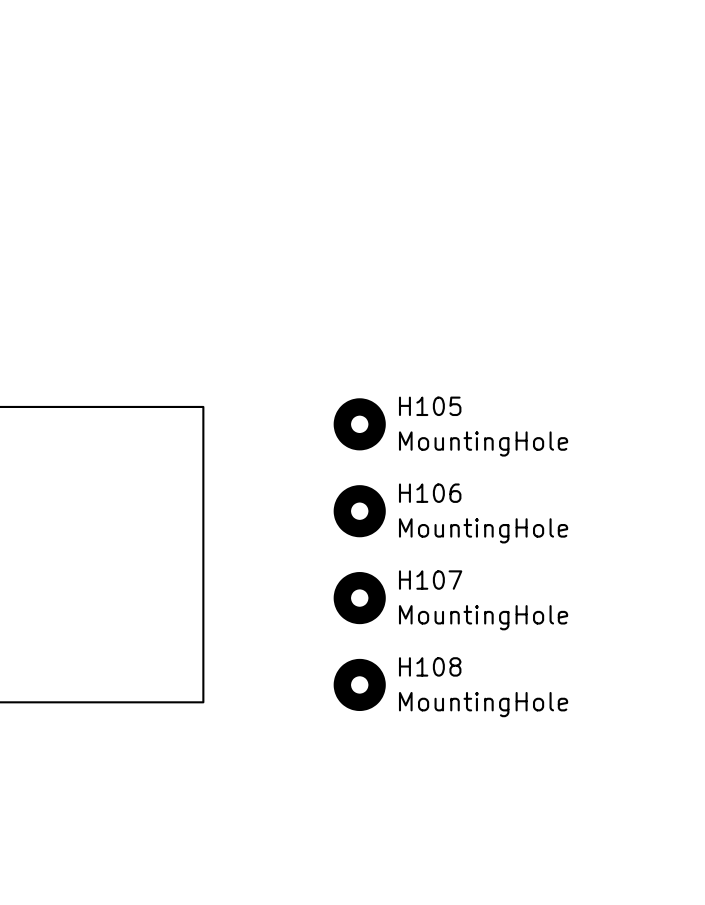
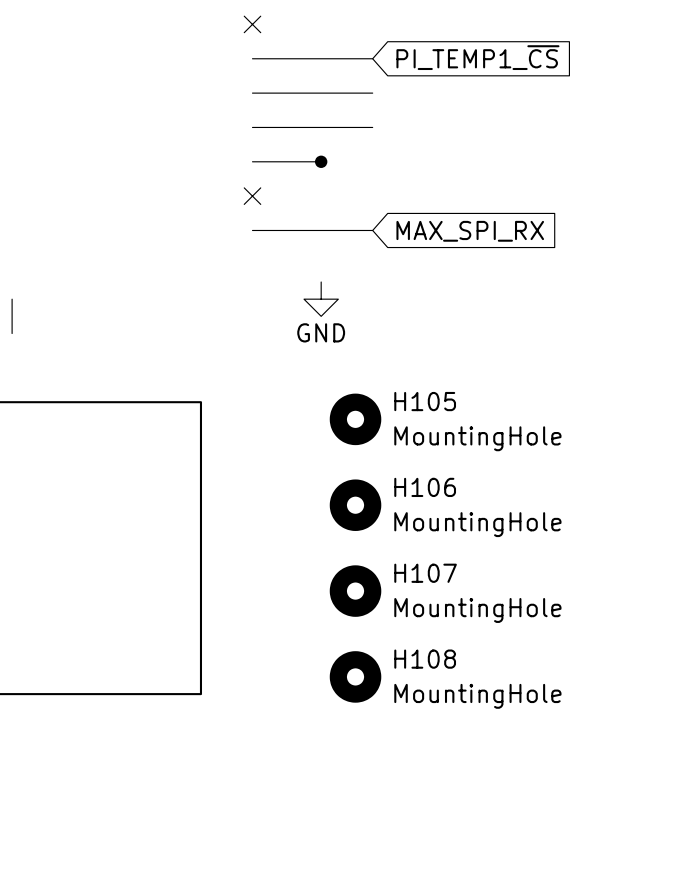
no-connect mark: none -> (252, 24)
global label: none -> PI_TEMP1_~{CS} (477, 57)
wire: none -> (252, 58) (372, 58)
wire: none -> (252, 93) (372, 93)
wire: none -> (252, 127) (372, 127)
wire: none -> (252, 161) (321, 161)
junction: none -> (321, 161)
no-connect mark: none -> (252, 196)
wire: none -> (252, 230) (372, 230)
global label: none -> MAX_SPI_RX (470, 231)
wire: none -> (12, 299) (12, 333)
power symbol: none -> GND (321, 299)

